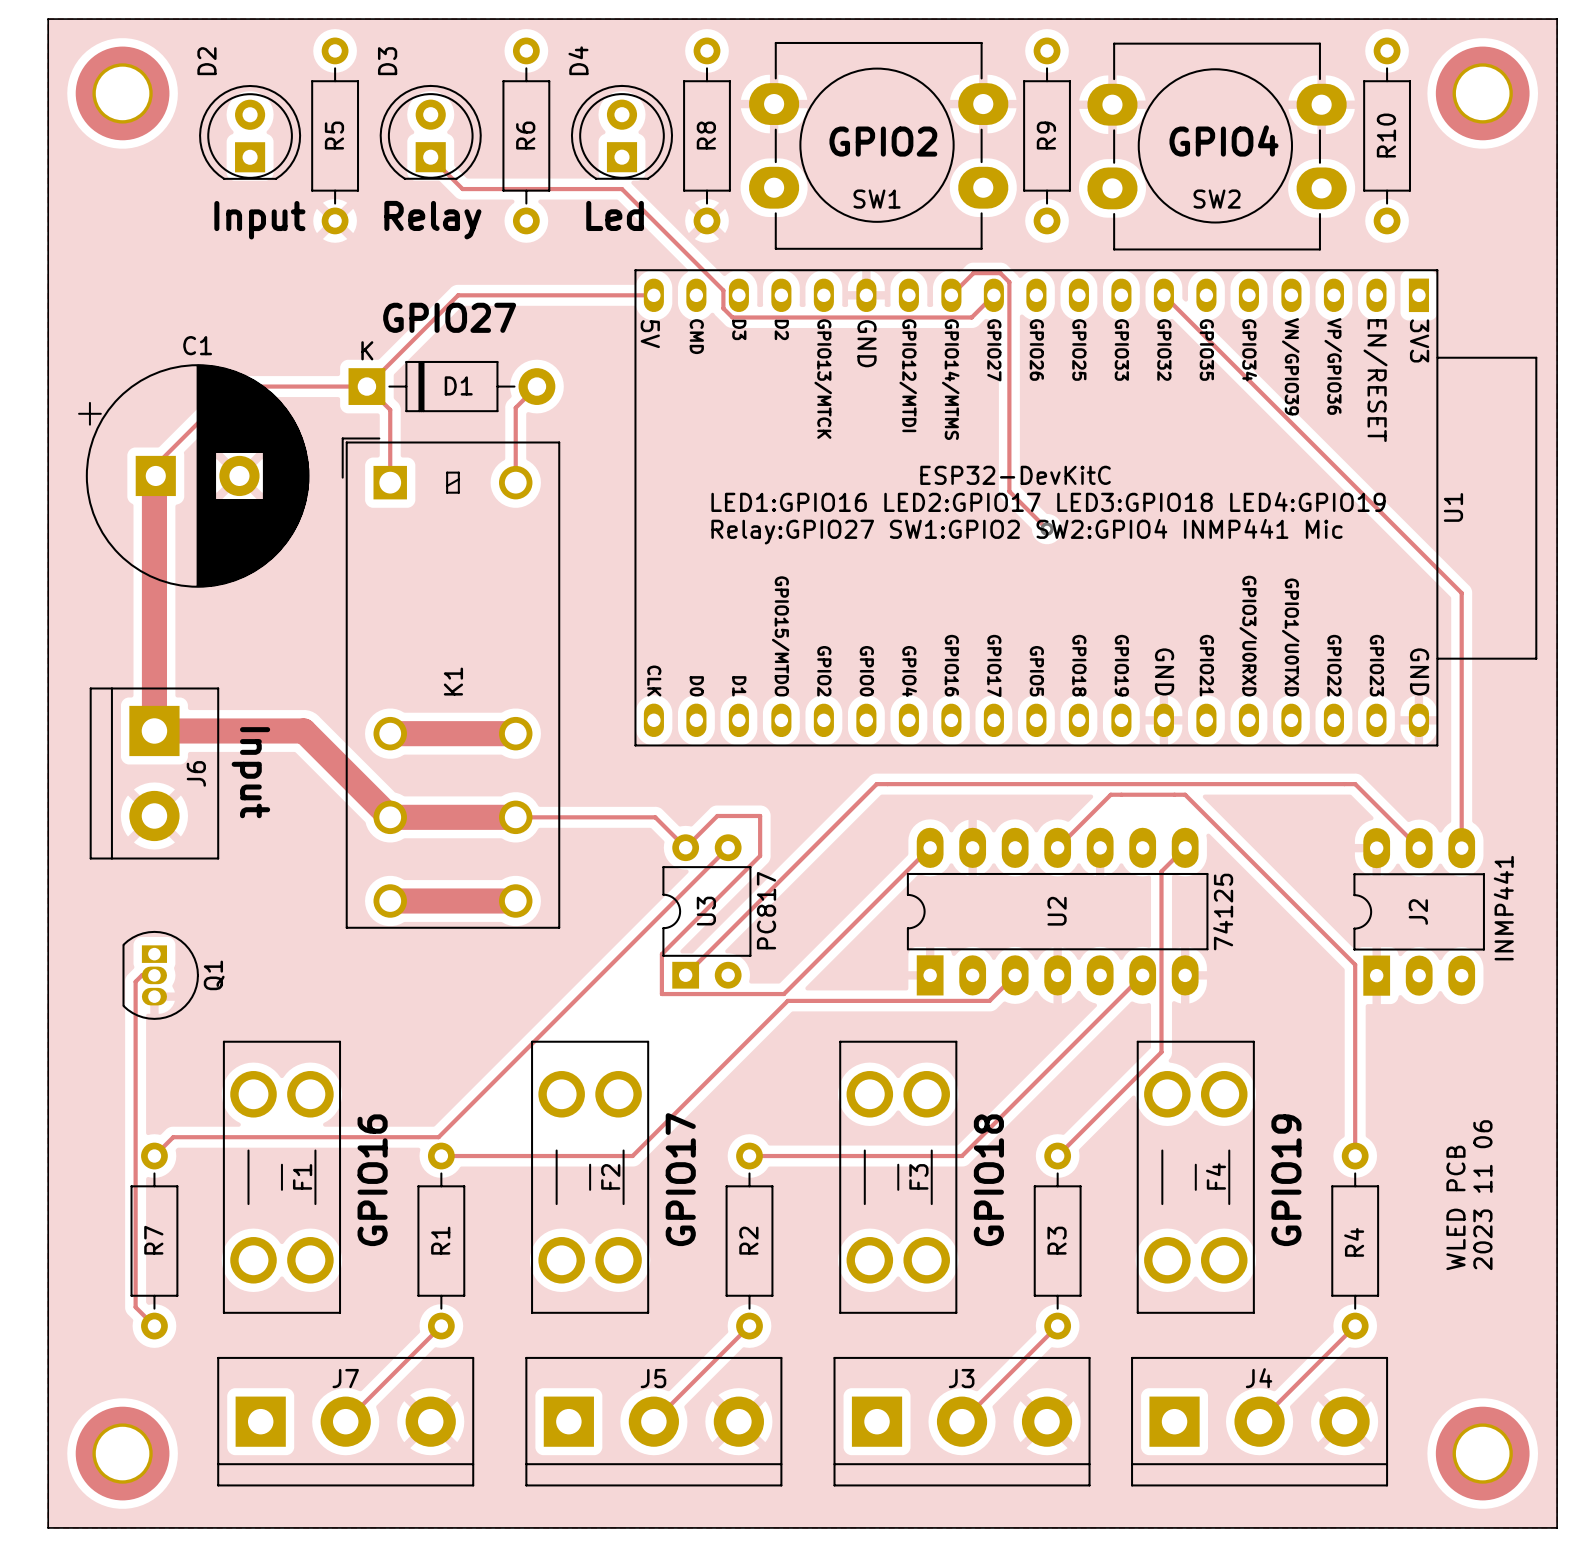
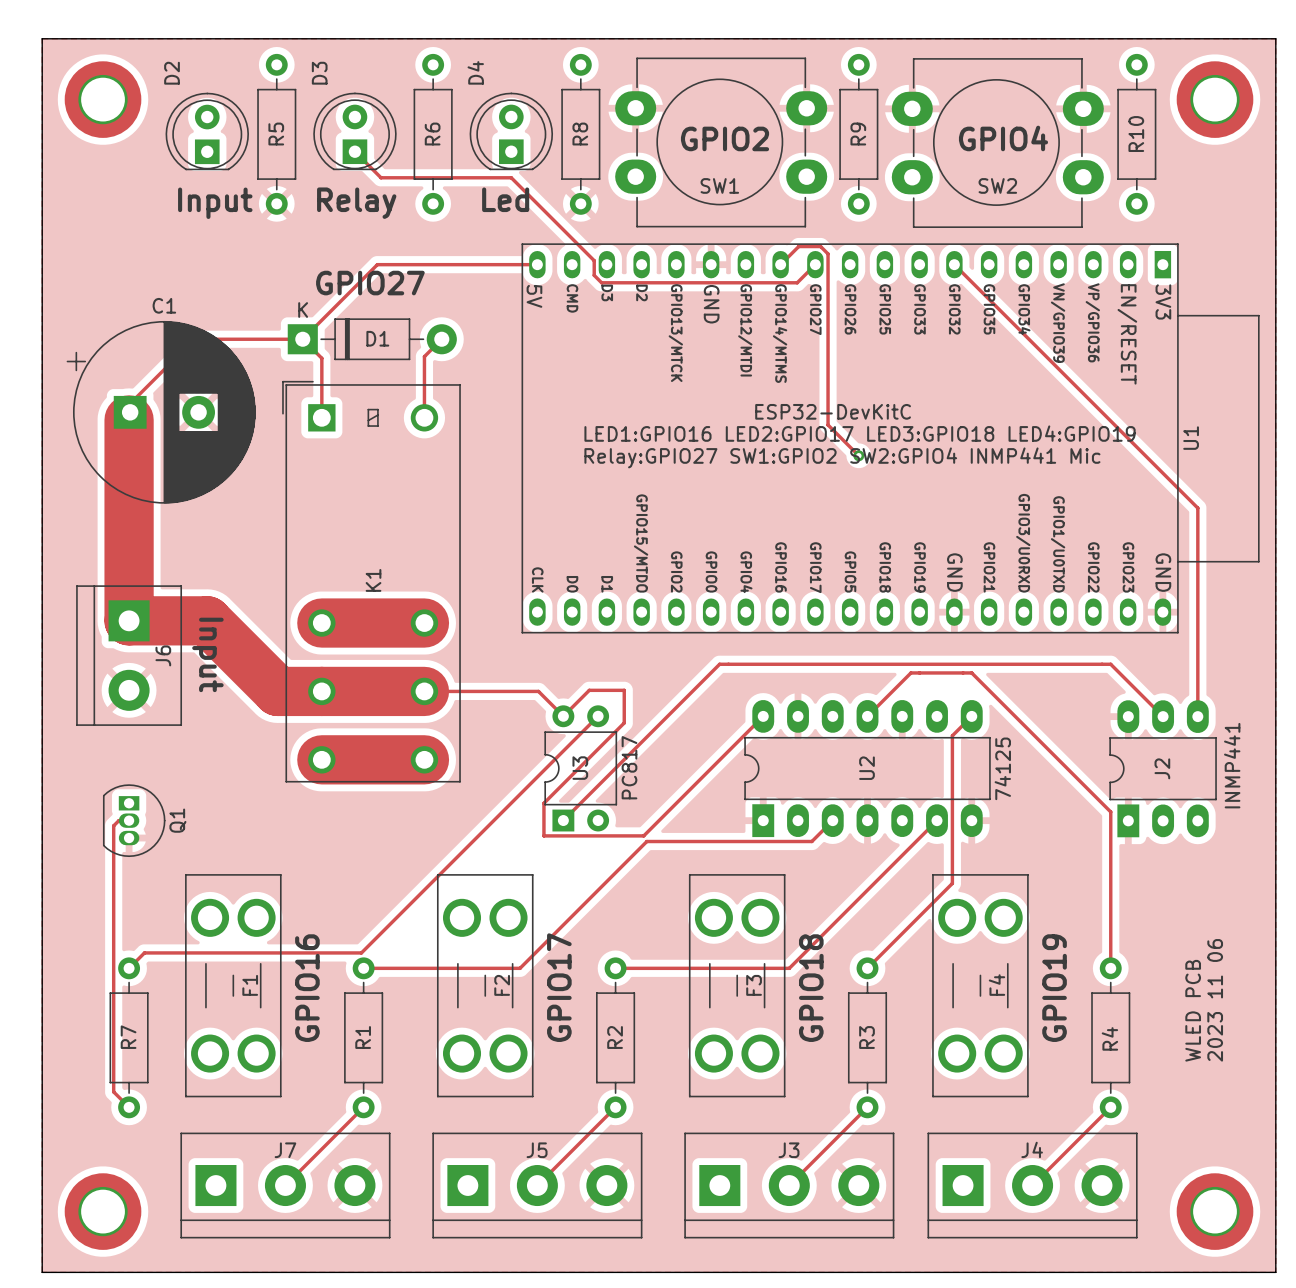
track width: thin (154, 485) (154, 730) (250, 730) -> thick (129, 419) (129, 620) (207, 620)
track: (250, 730) (303, 730) (390, 817) -> (207, 620) (277, 691) (321, 691)
track width: thin (390, 733) (515, 733) -> thick (321, 623) (424, 623)
track width: thin (390, 817) (515, 817) -> thick (321, 691) (424, 691)
track width: thin (390, 901) (515, 901) -> thick (321, 759) (424, 759)

